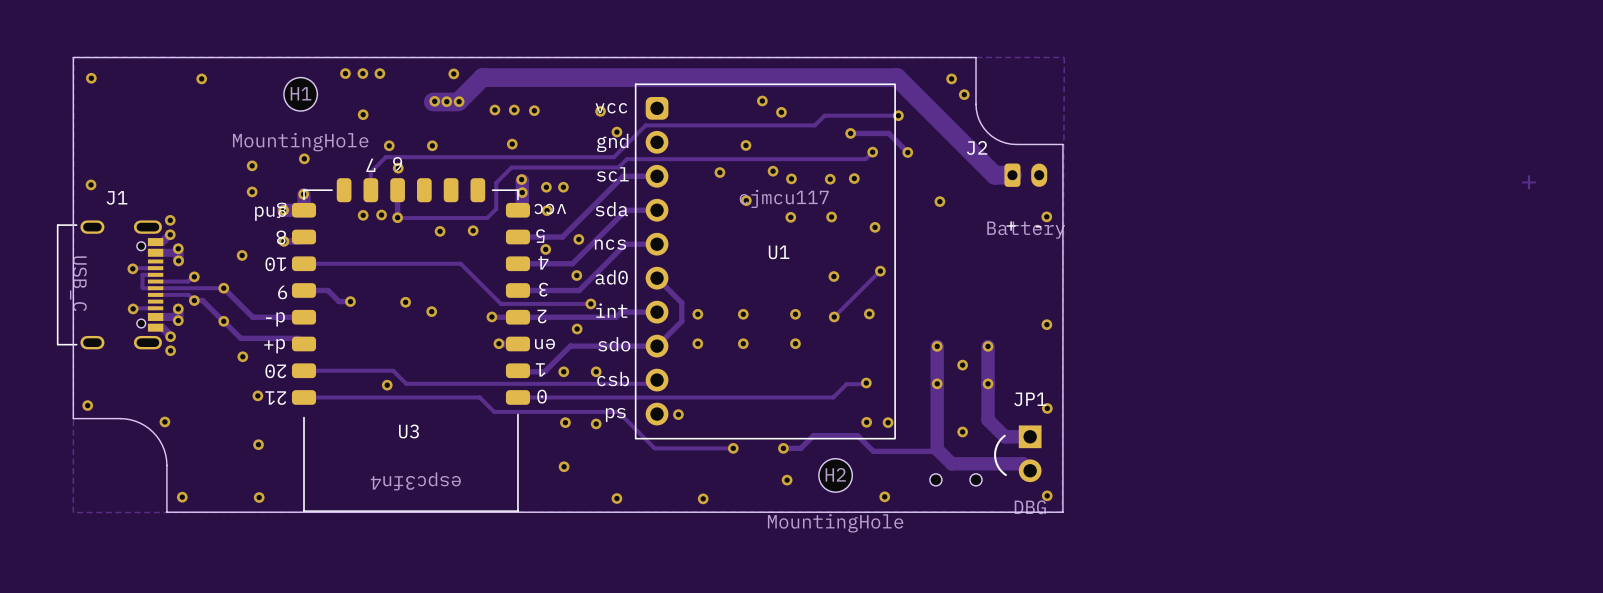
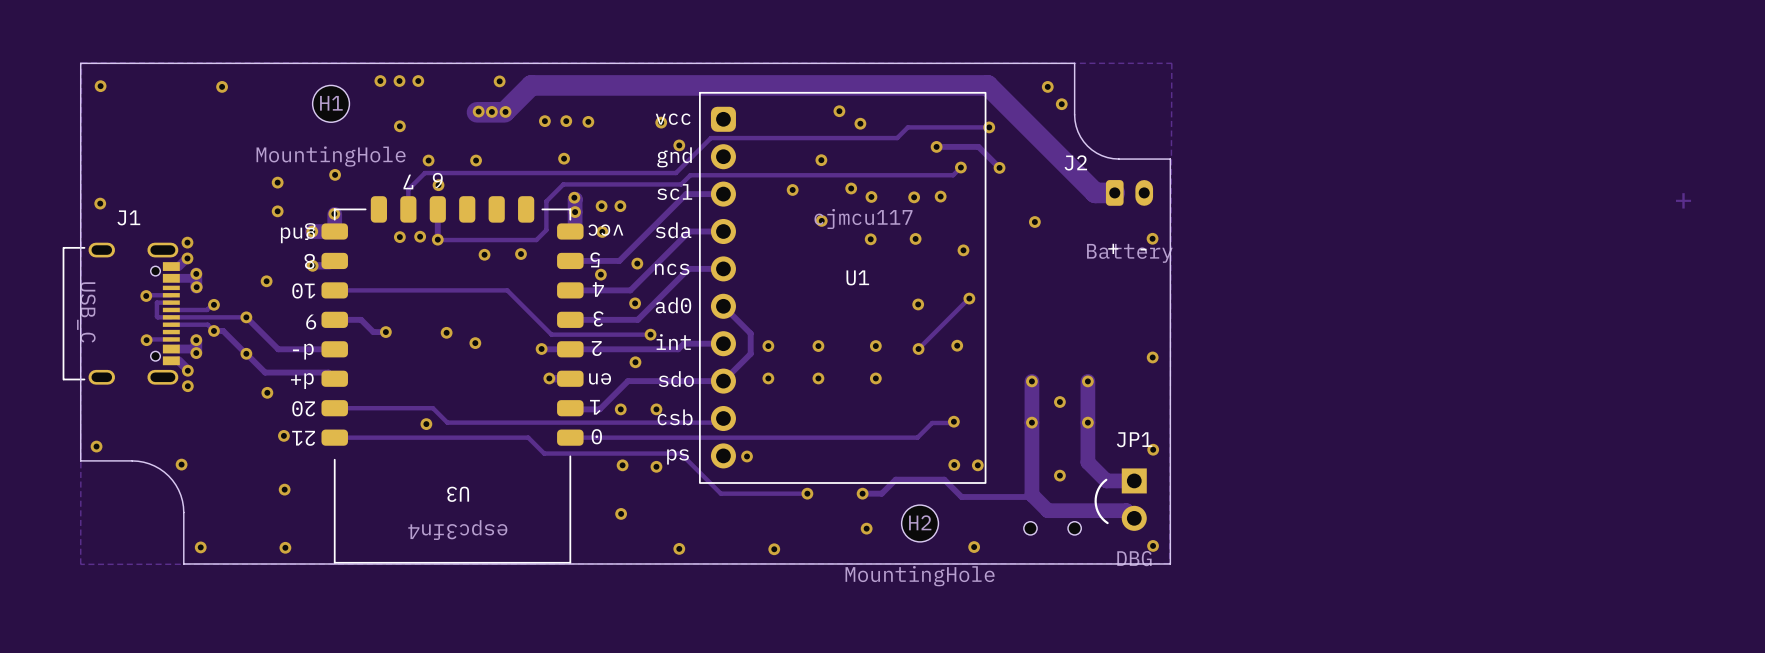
U3 name rotation: 0° (408, 431) -> 180° (458, 494)

